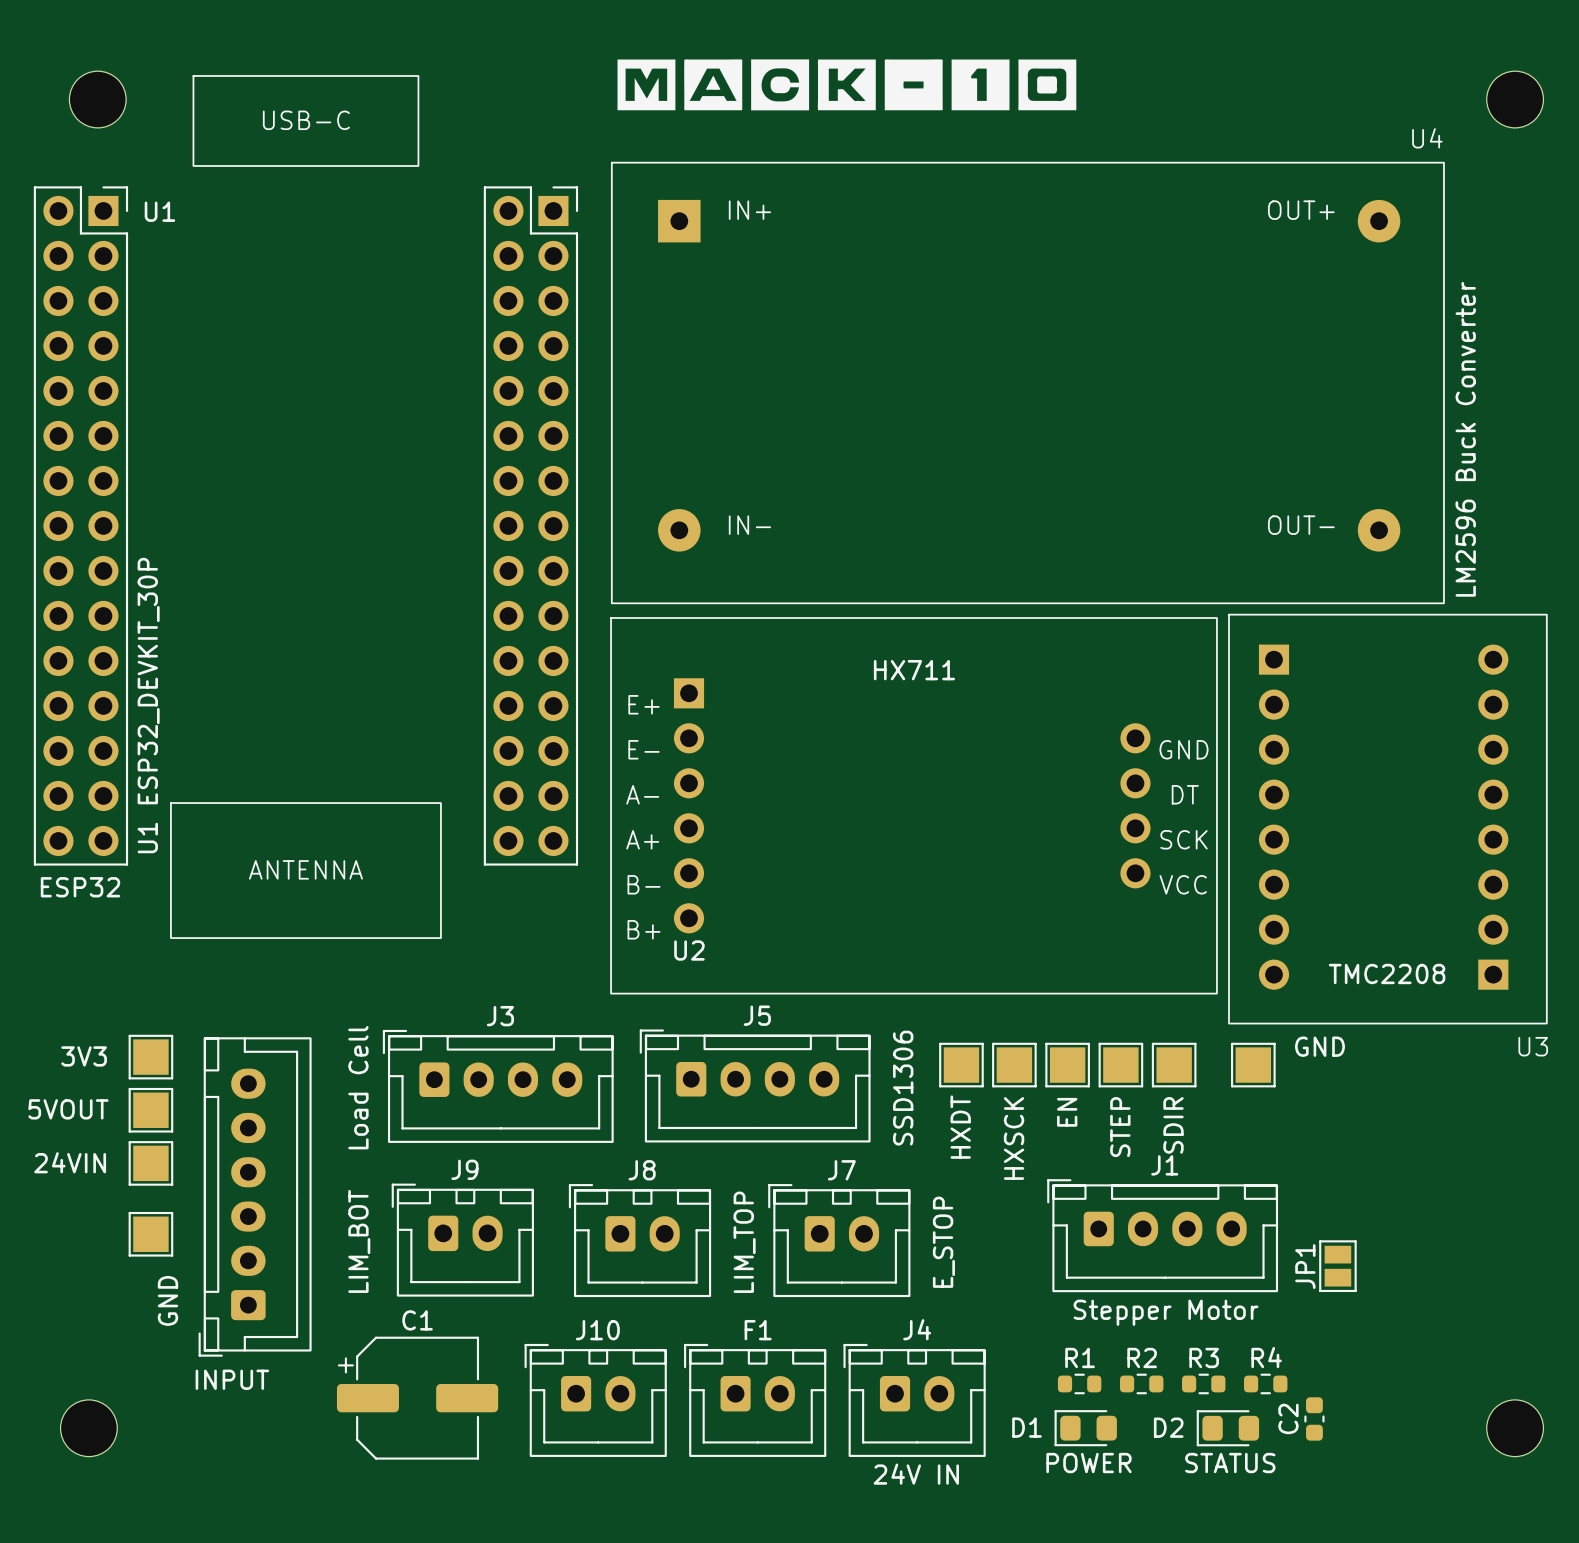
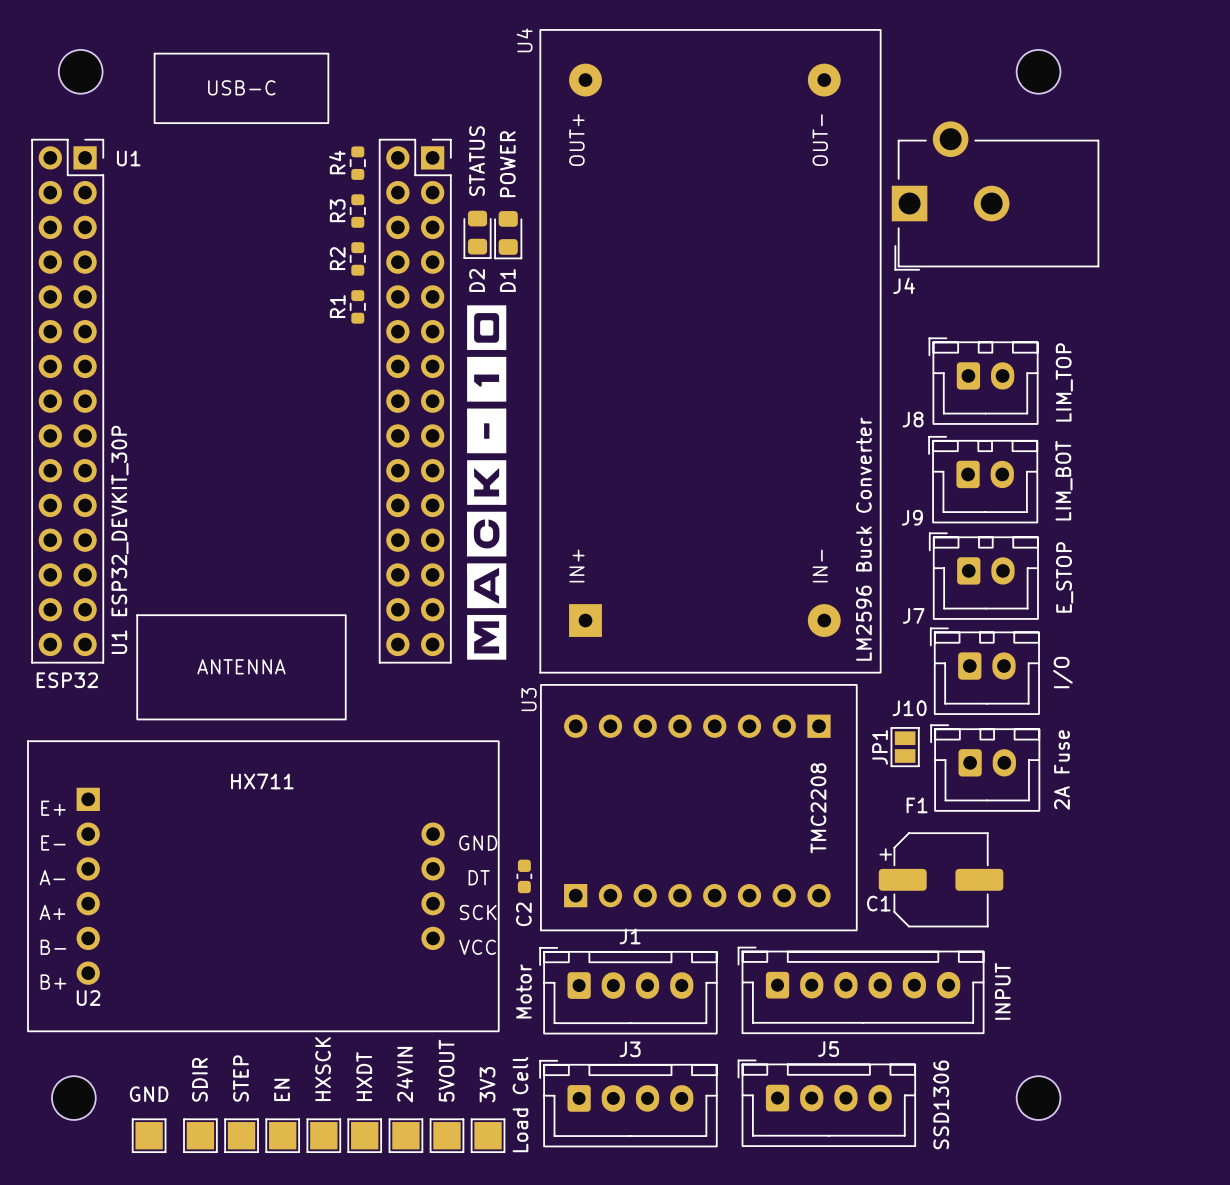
drawing: [617, 59, 1077, 111] -> none
part position: (1515, 99) -> (1038, 71)
U4 rotation: 0° (1027, 382) -> 90° counterclockwise (710, 351)
drawing: none -> [466, 305, 507, 660]
U4 value position: LM2596 Buck Converter (1465, 439) -> LM2596 Buck Converter (863, 539)
U2 footprint: [610, 617, 1218, 995] -> [27, 740, 500, 1032]
U3 rotation: 0° (1387, 819) -> 90° counterclockwise (698, 807)
U3 position: (1387, 819) -> (698, 807)
J10 value: none -> I/O (1062, 672)
F1 value: none -> 2A Fuse (1061, 770)
U3 name position: U3 (1533, 1046) -> U3 (529, 699)
part: 3V3 (150, 1057) -> none
part: HXDT (961, 1065) -> none
part: HXSCK (1014, 1065) -> none
part: EN (1067, 1065) -> none
part: STEP (1120, 1065) -> none
part: SDIR (1174, 1065) -> none
part: GND (1253, 1065) -> none
J5 position: (755, 1085) -> (826, 1103)
J3 position: (498, 1086) -> (628, 1103)
part: 5VOUT (150, 1110) -> none
part: 24VIN (150, 1163) -> none
J9 name position: J9 (464, 1169) -> J9 (912, 517)
J8 name position: J8 (642, 1170) -> J8 (913, 419)
J7 name position: J7 (841, 1170) -> J7 (913, 615)
part: INPUT (255, 1196) -> none
part position: (150, 1234) -> (149, 1135)
J1 position: (1162, 1235) -> (628, 990)
J9 position: (462, 1240) -> (983, 479)
J8 position: (639, 1240) -> (983, 381)
J7 position: (839, 1240) -> (983, 576)
J9 value position: LIM_BOT (359, 1241) -> LIM_BOT (1064, 480)
JP1 position: (1337, 1266) -> (905, 747)
part: none -> INPUT (861, 990)
part value rotation: 0° (167, 1300) -> 90° clockwise (149, 1094)
part value position: GND (167, 1300) -> GND (149, 1094)
J1 value: Stepper Motor (1166, 1312) -> Motor (523, 991)
C1 name position: C1 (417, 1320) -> C1 (878, 903)
J4 name position: J4 (917, 1329) -> J4 (904, 285)
J10 name position: J10 (597, 1330) -> J10 (909, 708)
F1 name position: F1 (758, 1330) -> F1 (917, 805)
J4 footprint: [843, 1343, 986, 1457] -> [891, 121, 1100, 271]
R1 name position: R1 (1080, 1357) -> R1 (337, 306)
R2 name position: R2 (1142, 1357) -> R2 (337, 258)
R3 name position: R3 (1204, 1357) -> R3 (337, 210)
R4 name position: R4 (1266, 1357) -> R4 (337, 162)
R1 rotation: 0° (1079, 1383) -> 90° clockwise (357, 306)
R1 position: (1079, 1383) -> (357, 306)
R2 rotation: 0° (1141, 1383) -> 90° clockwise (357, 258)
R2 position: (1141, 1383) -> (357, 258)
R3 rotation: 0° (1203, 1383) -> 90° clockwise (357, 211)
R3 position: (1203, 1383) -> (357, 211)
R4 rotation: 0° (1265, 1383) -> 90° clockwise (357, 163)
R4 position: (1265, 1383) -> (357, 163)
C1 position: (417, 1398) -> (941, 879)
J10 position: (595, 1400) -> (984, 671)
F1 position: (755, 1400) -> (985, 768)
C2 name position: C2 (1288, 1418) -> C2 (523, 914)
C2 position: (1314, 1418) -> (524, 876)
D1 rotation: 0° (1085, 1428) -> 90° counterclockwise (508, 235)
D1 position: (1085, 1428) -> (508, 235)
D2 rotation: 0° (1227, 1428) -> 90° counterclockwise (477, 234)
D2 position: (1227, 1428) -> (477, 234)
part position: (1515, 1428) -> (1038, 1098)
D1 value position: POWER (1088, 1463) -> POWER (507, 164)
D2 value position: STATUS (1230, 1463) -> STATUS (477, 161)
J4 value: 24V IN (916, 1474) -> none
part: none -> SDIR (200, 1135)
part: none -> STEP (241, 1135)
part: none -> EN (282, 1135)
part: none -> HXSCK (323, 1135)
part: none -> HXDT (364, 1135)
part: none -> 24VIN (405, 1135)
part: none -> 5VOUT (446, 1135)
part: none -> 3V3 (488, 1135)

